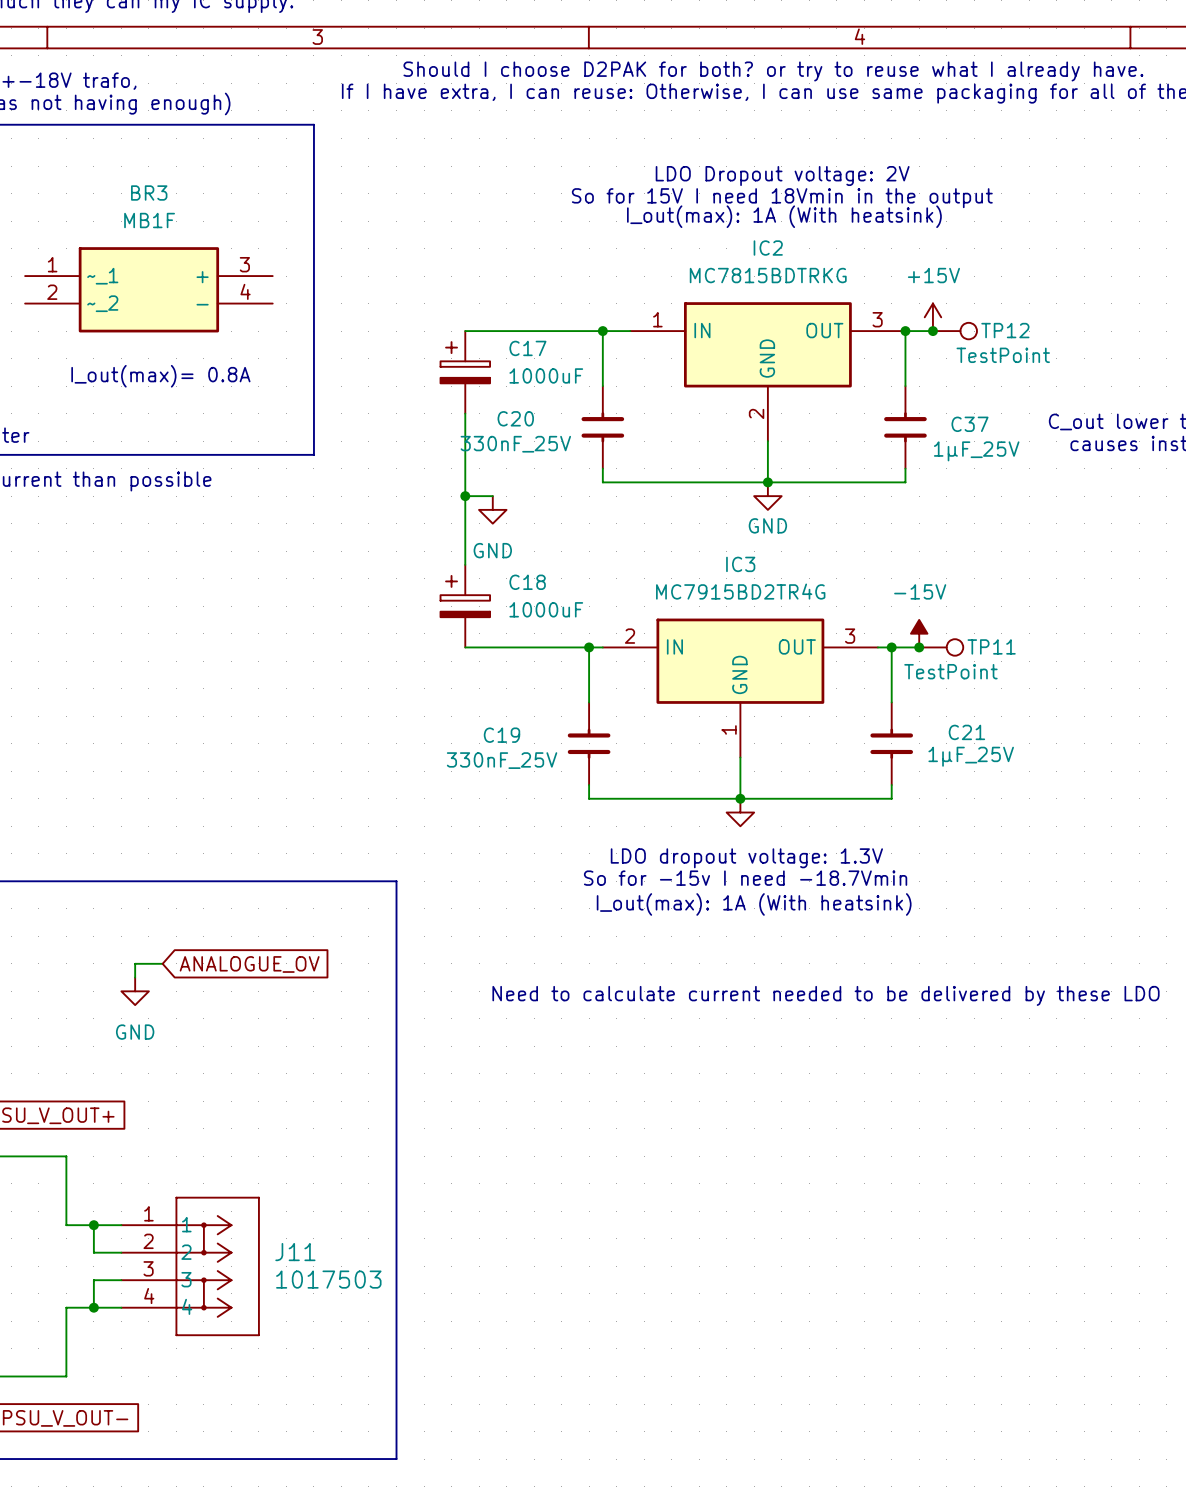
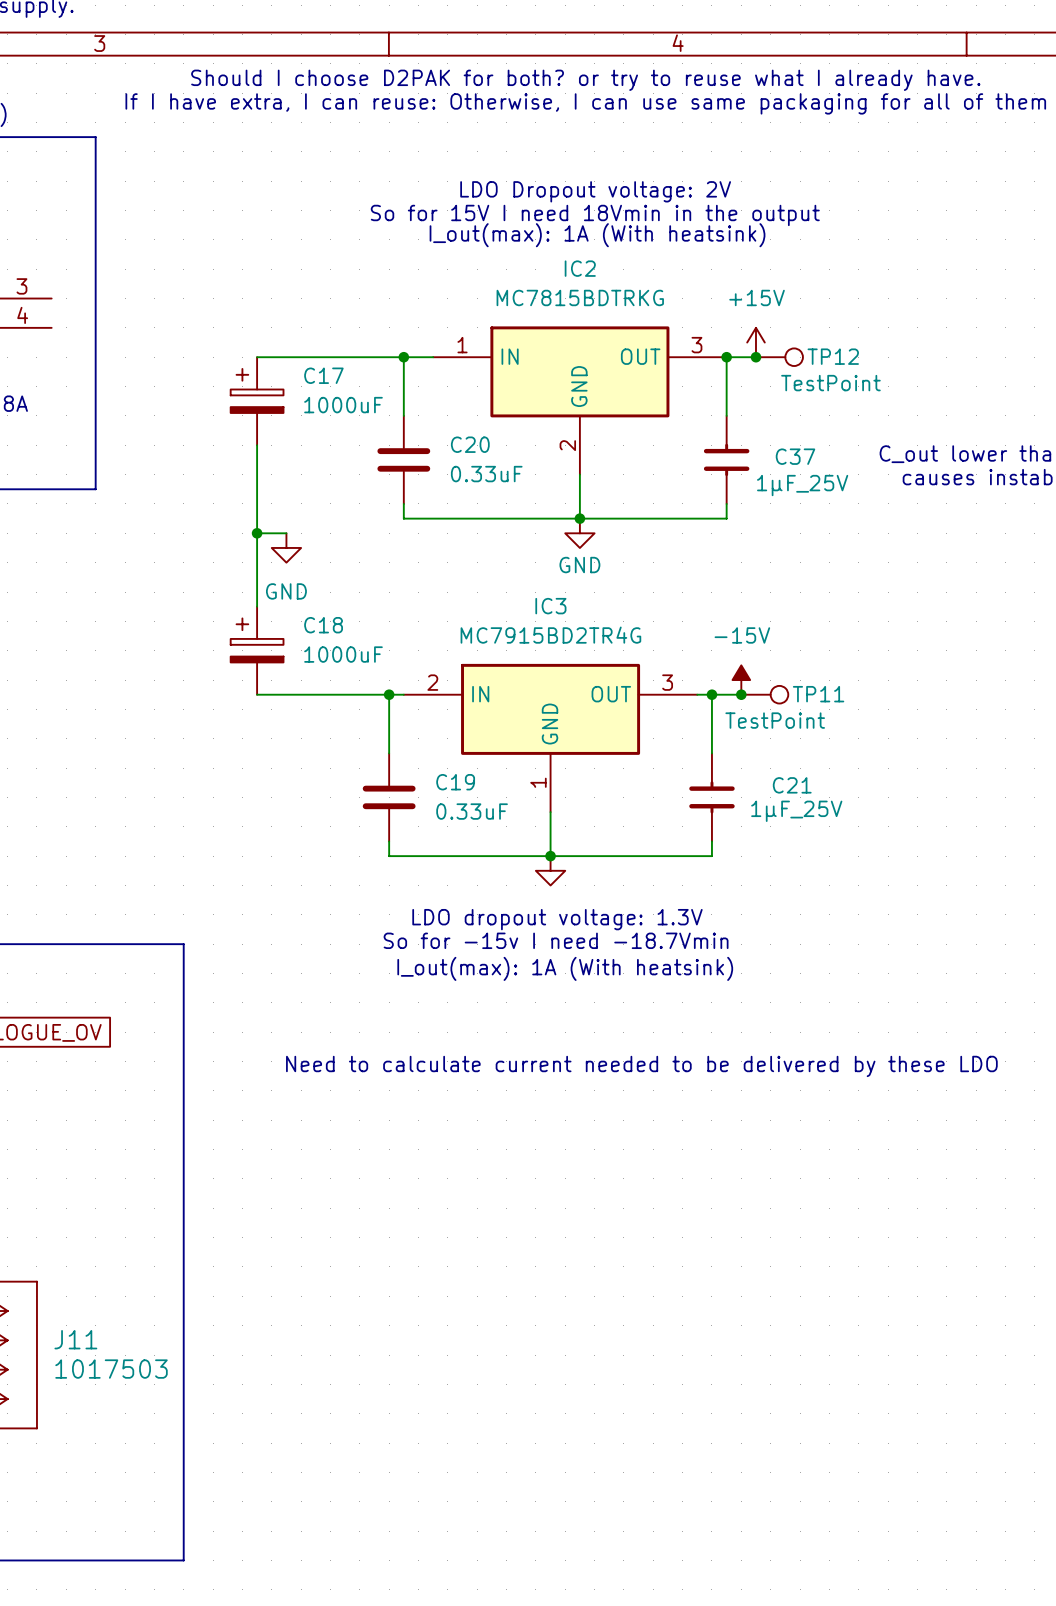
C20 symbol: [581, 386, 625, 469] -> [377, 415, 431, 504]
C20 name position: C20 (515, 418) -> C20 (470, 444)
C20 value: 330nF_25V (515, 444) -> 0.33uF (486, 474)
C19 symbol: [567, 702, 611, 786] -> [362, 753, 416, 842]
C19 name position: C19 (501, 735) -> C19 (455, 782)
C19 value: 330nF_25V (502, 760) -> 0.33uF (472, 811)

